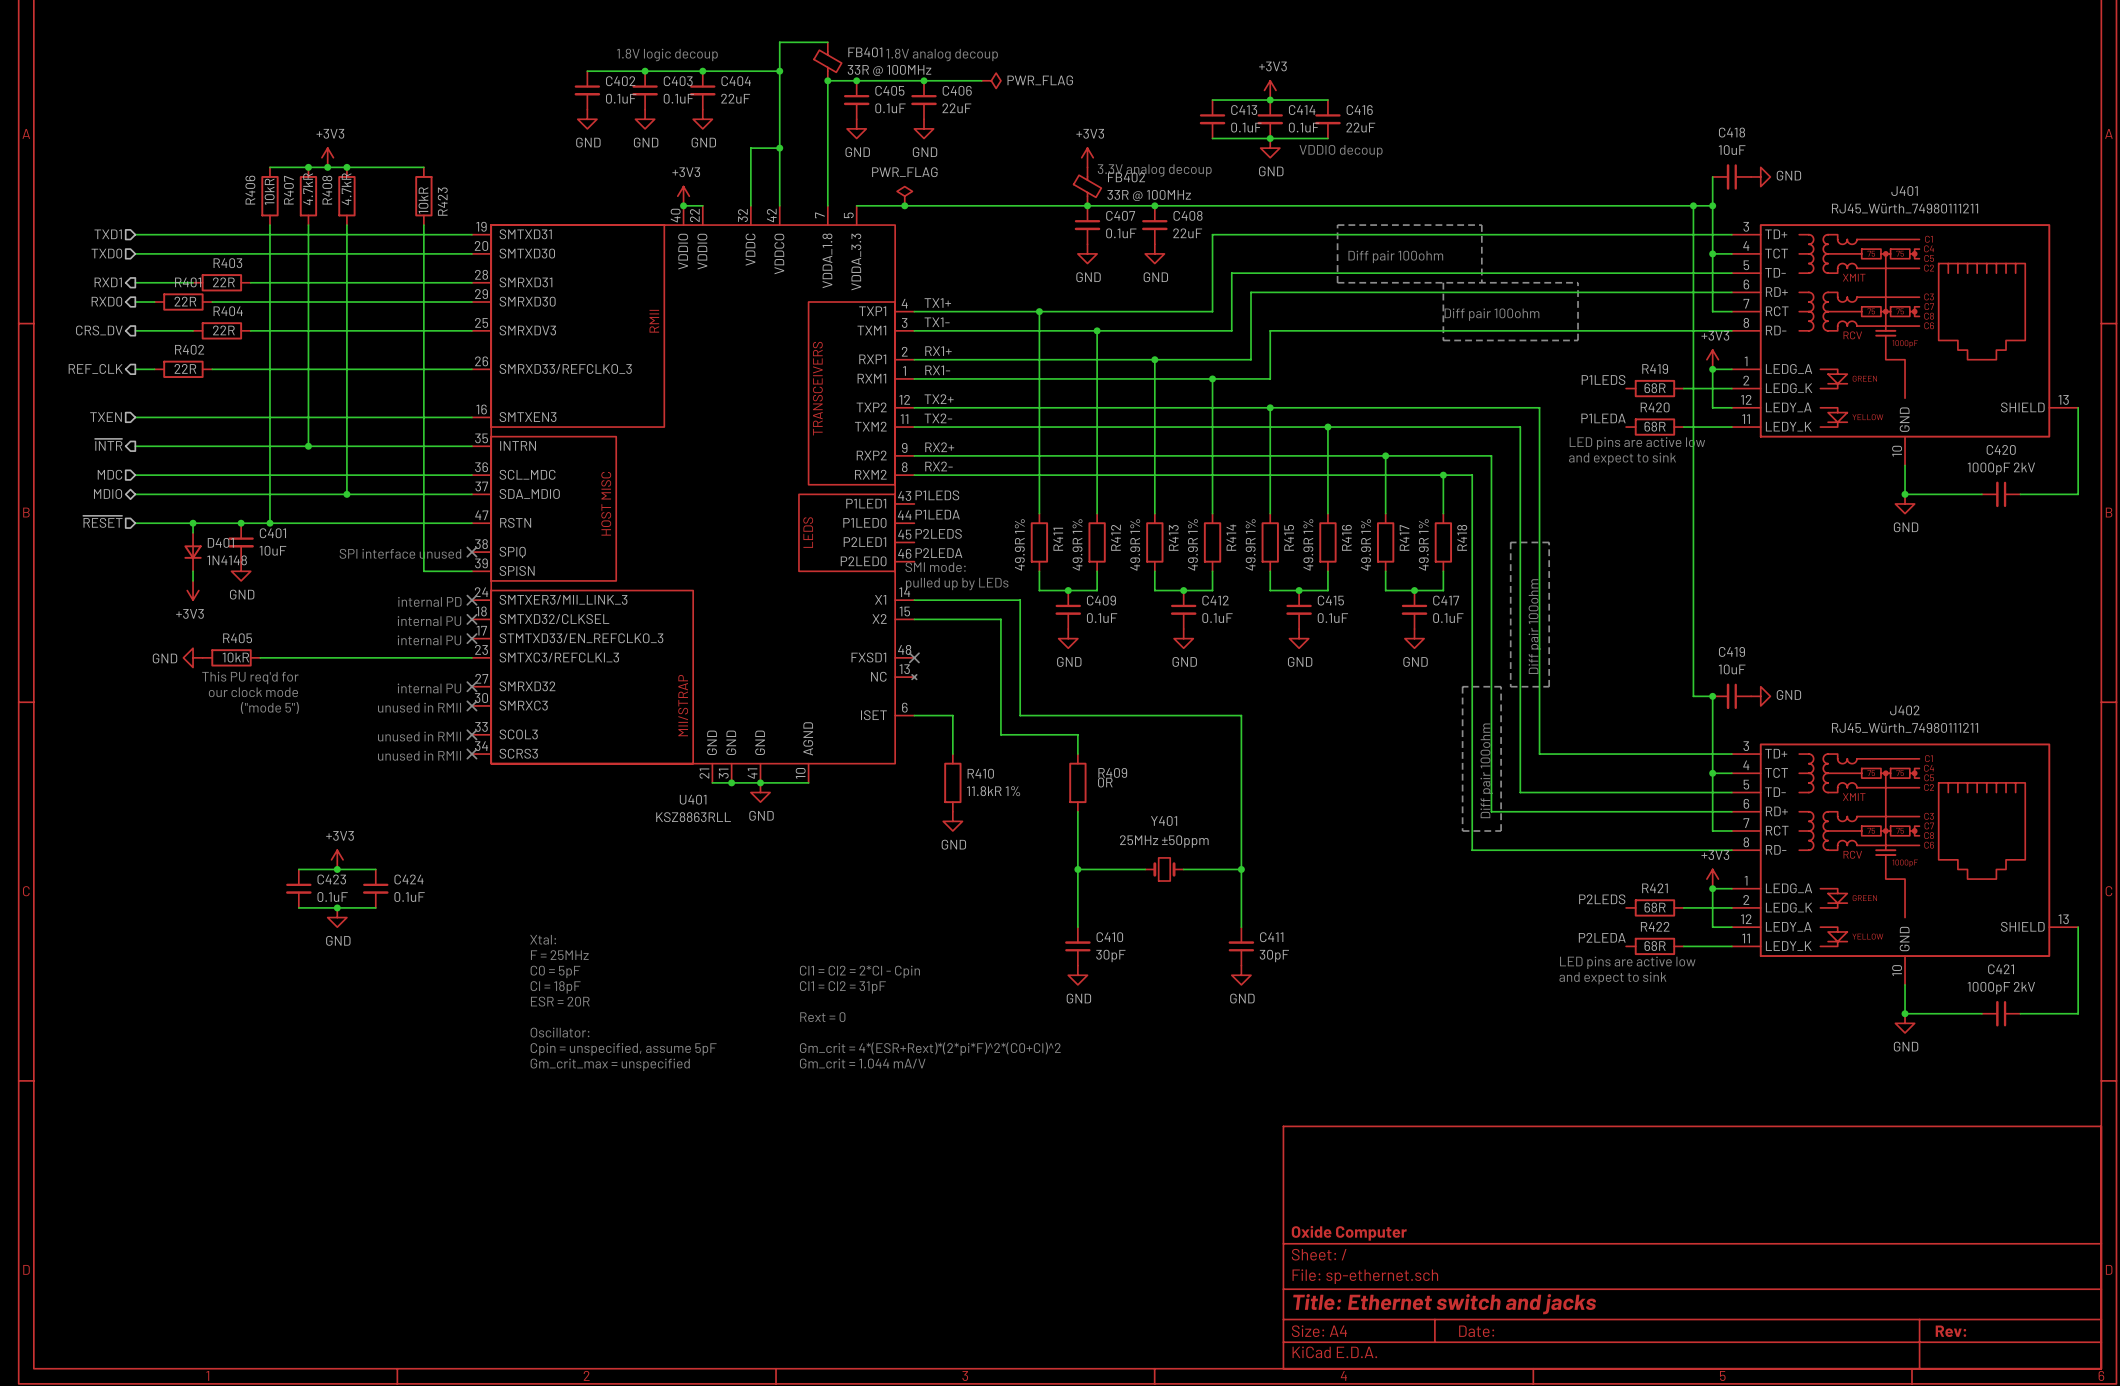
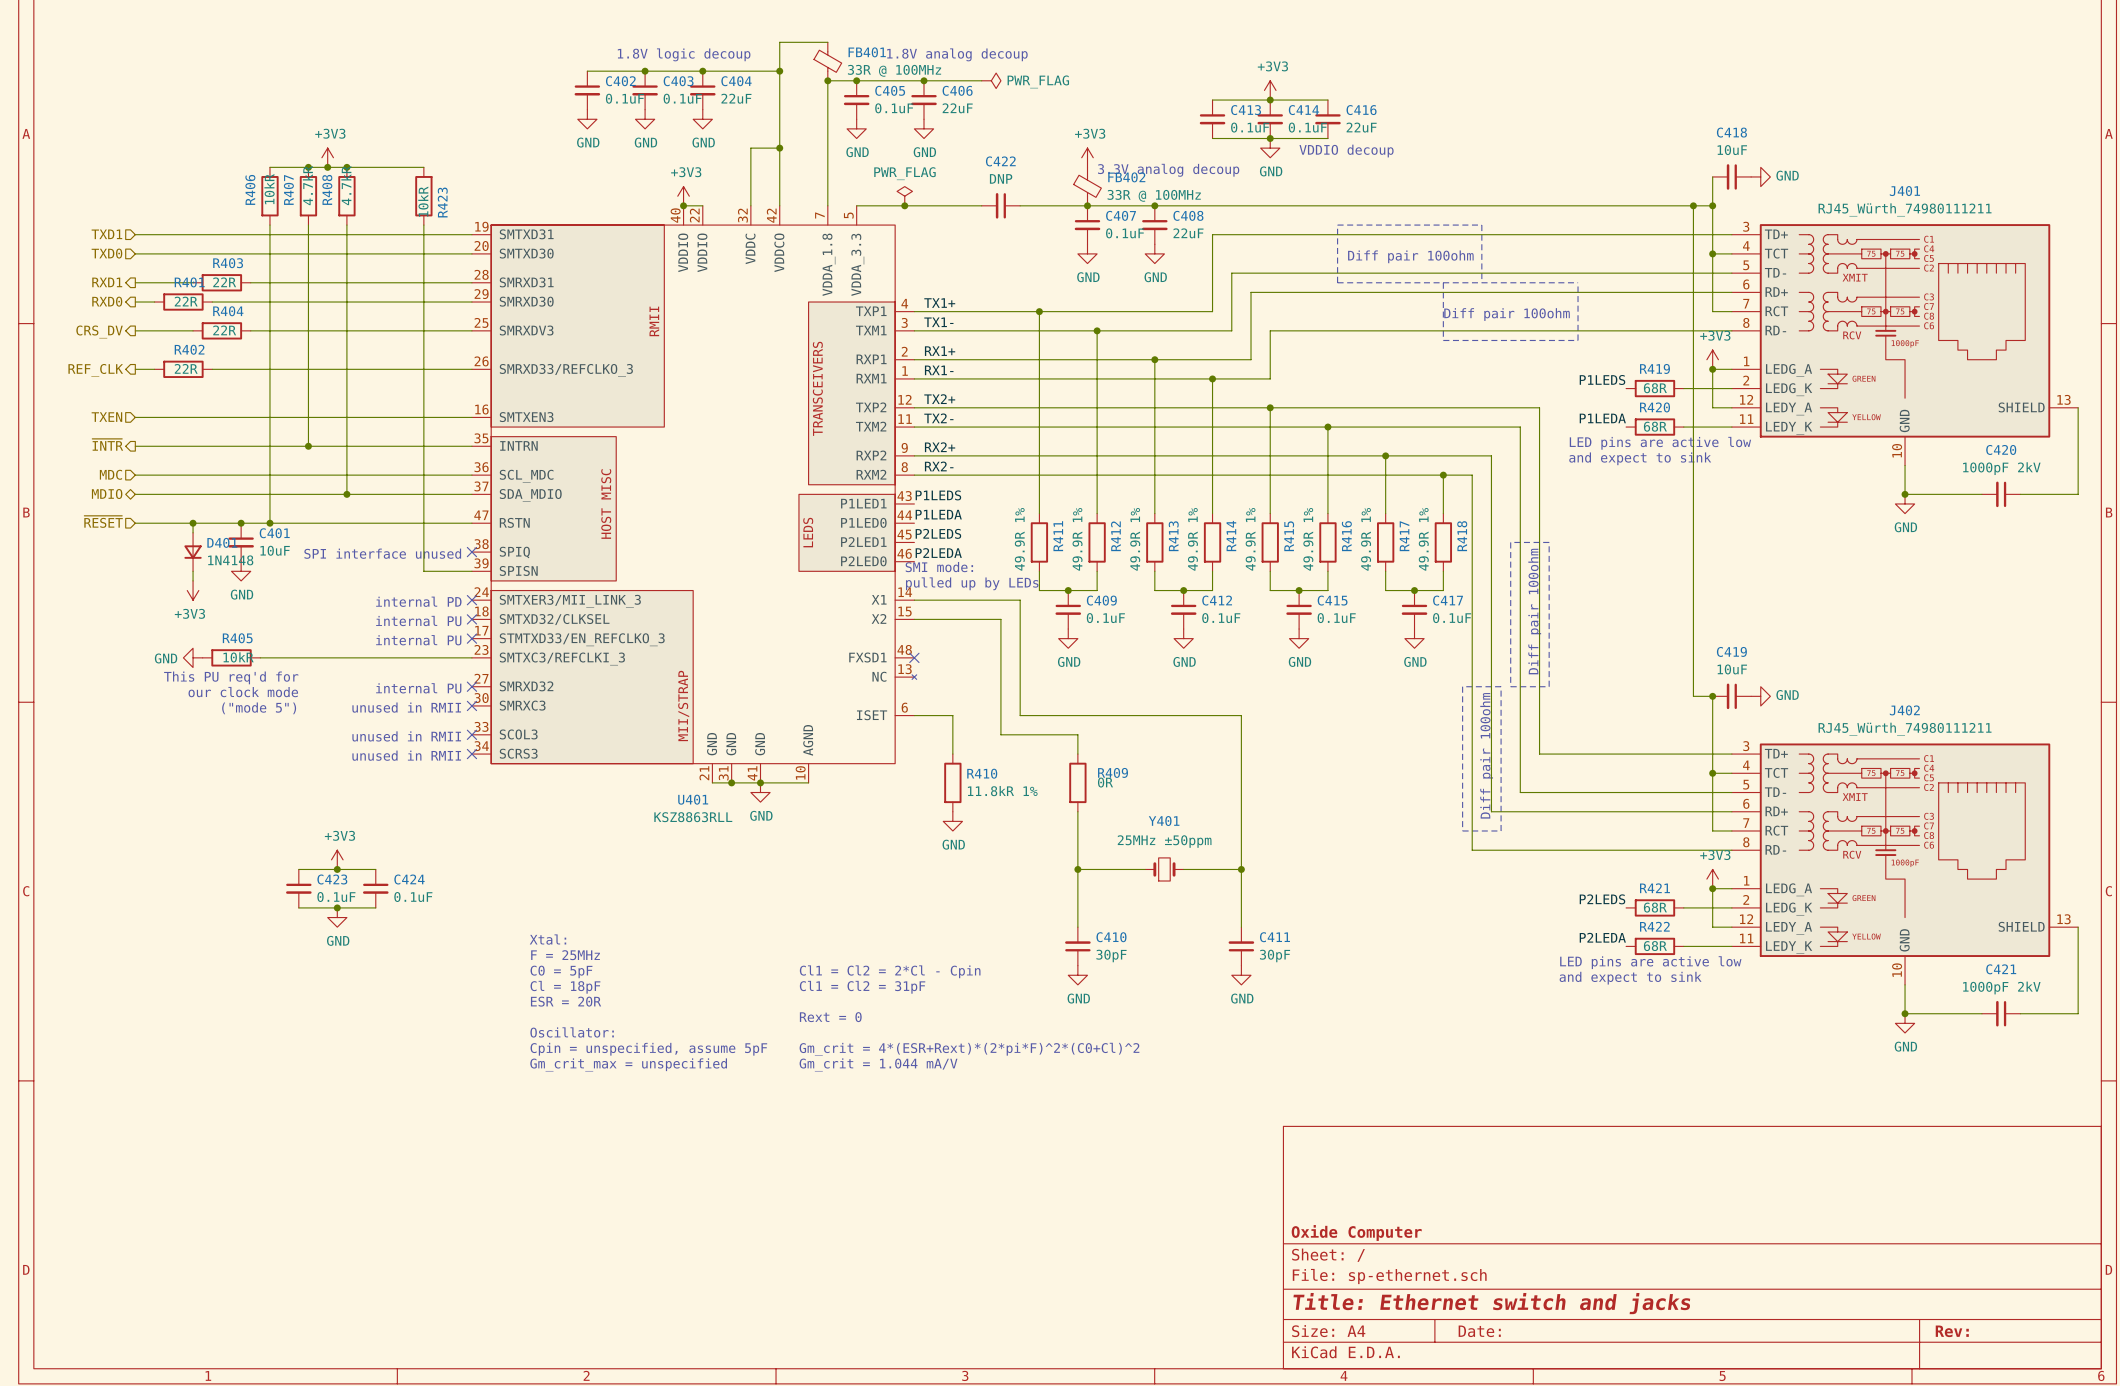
C422: none -> DNP (1000, 205)

